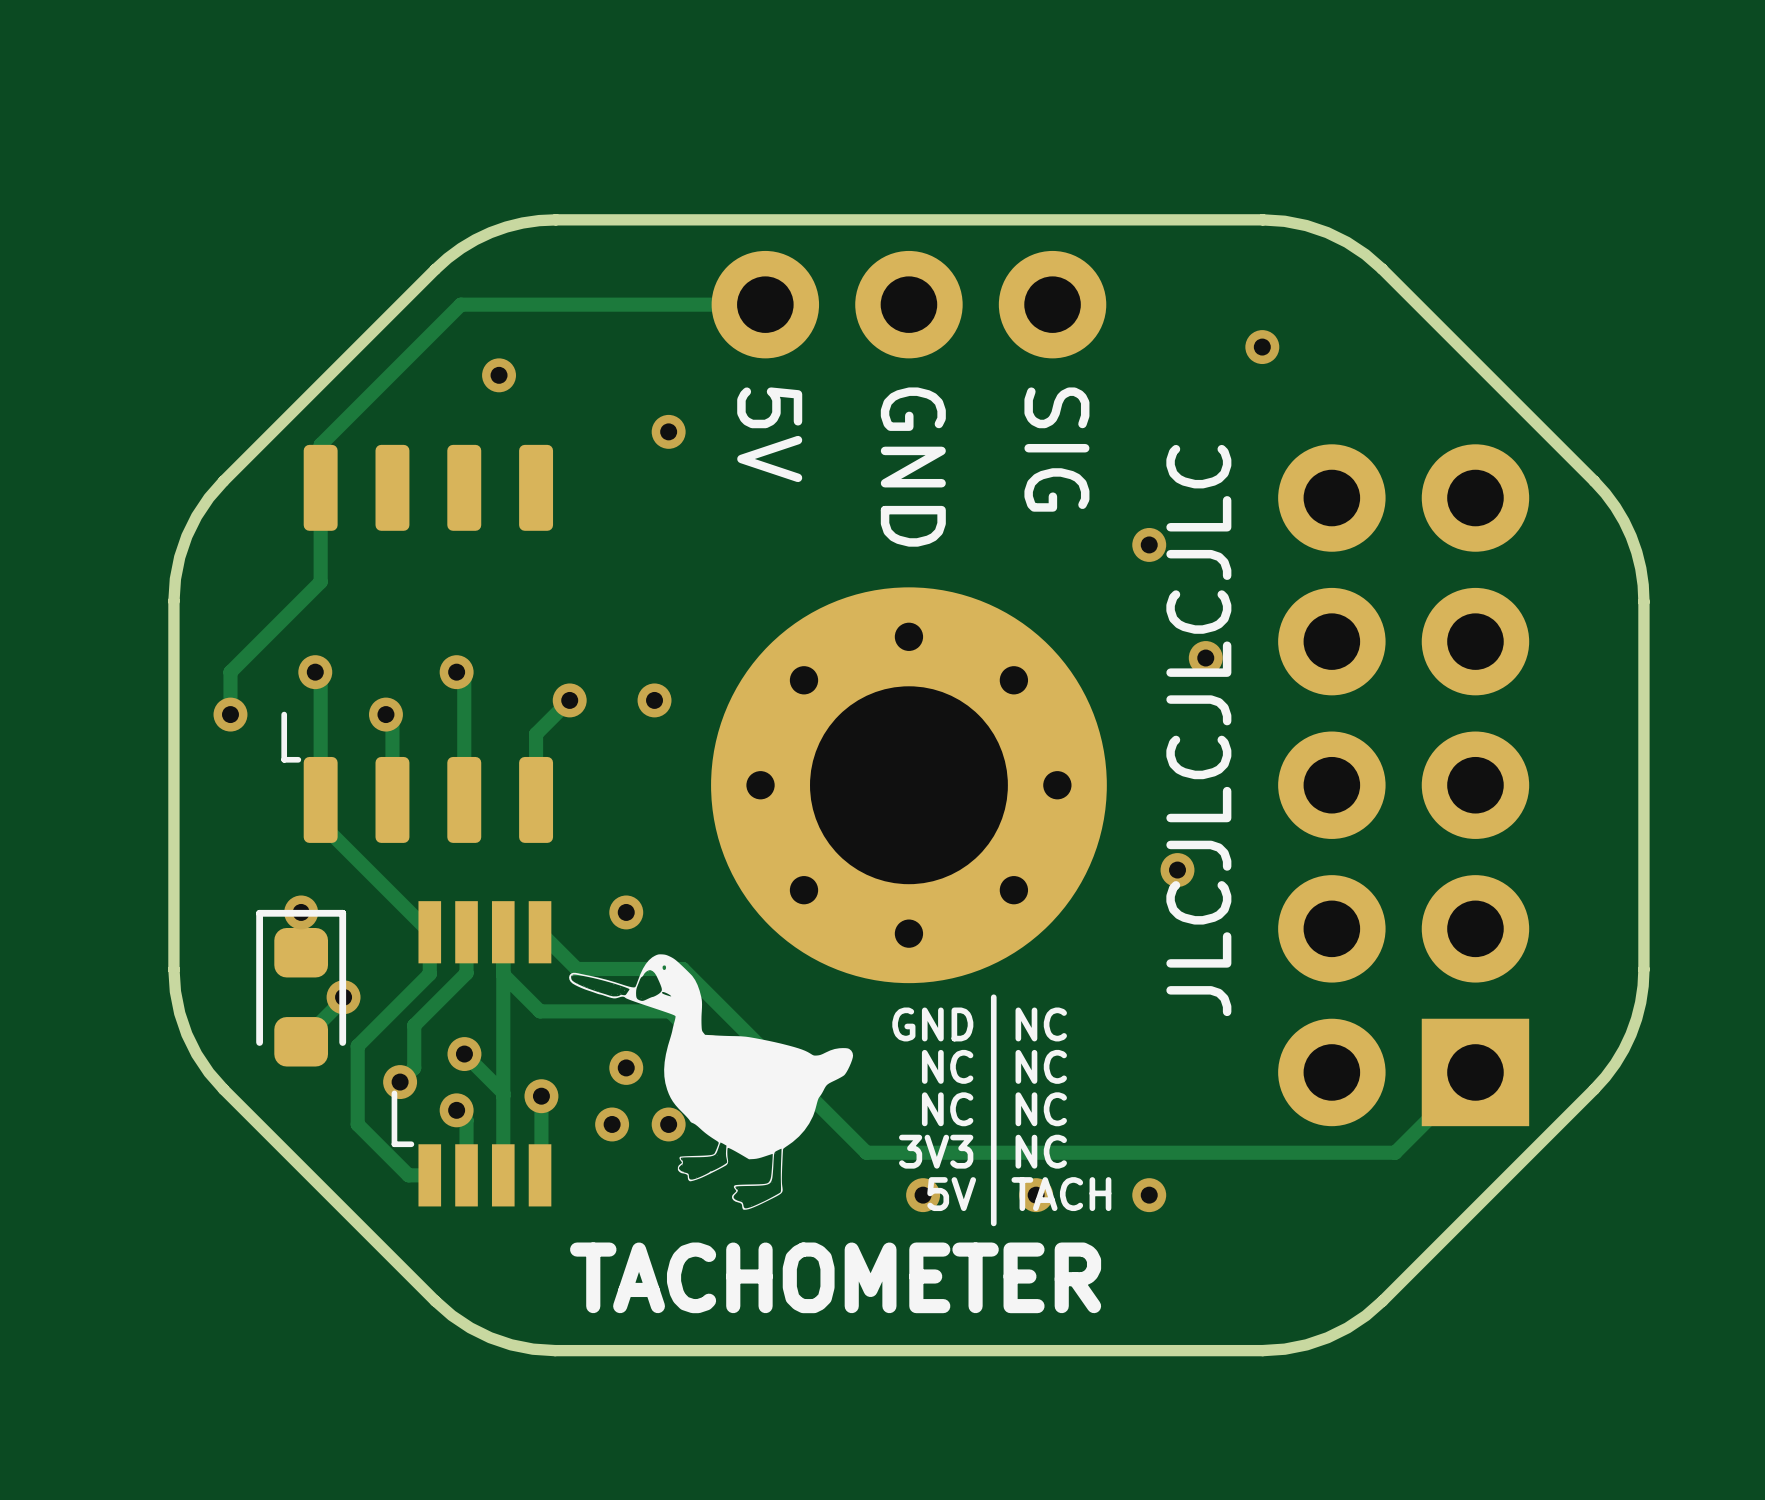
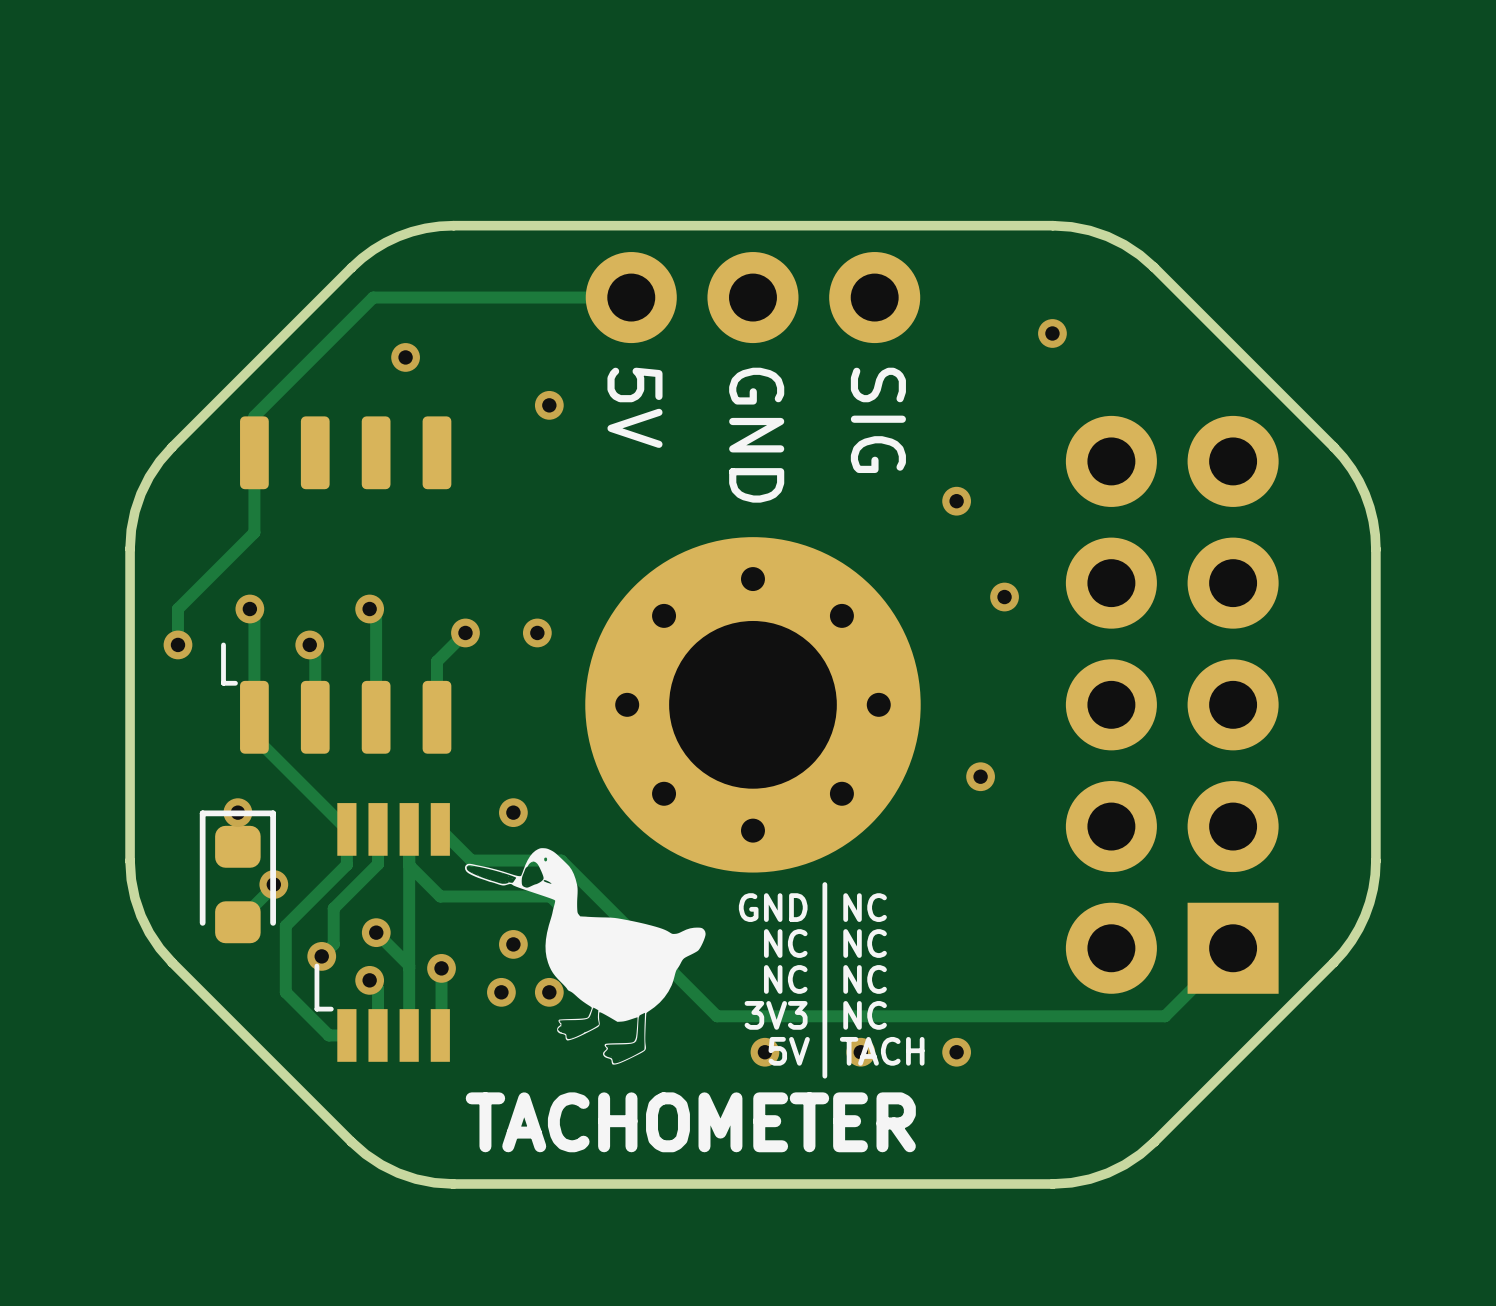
text: JLCJLCJLCJLC (1198, 730) -> none

